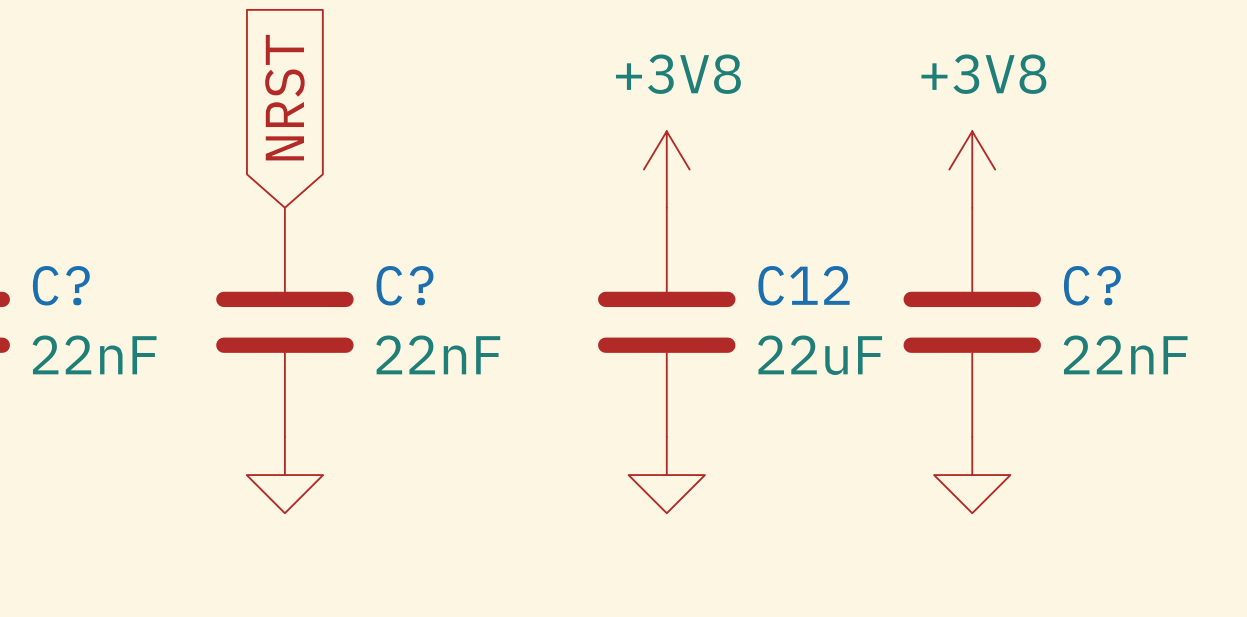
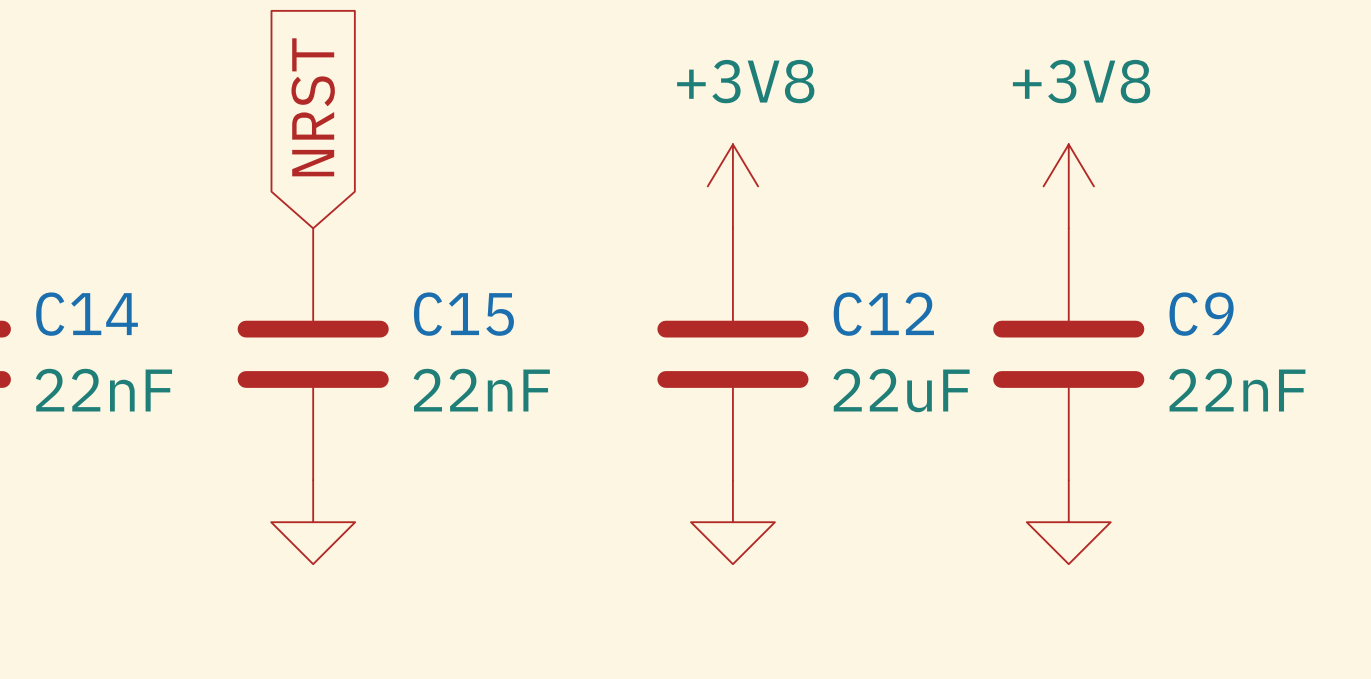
C? name: C? (61, 285) -> C14 (87, 314)
C? name: C? (405, 285) -> C15 (463, 314)
C? name: C? (1092, 285) -> C9 (1201, 314)

